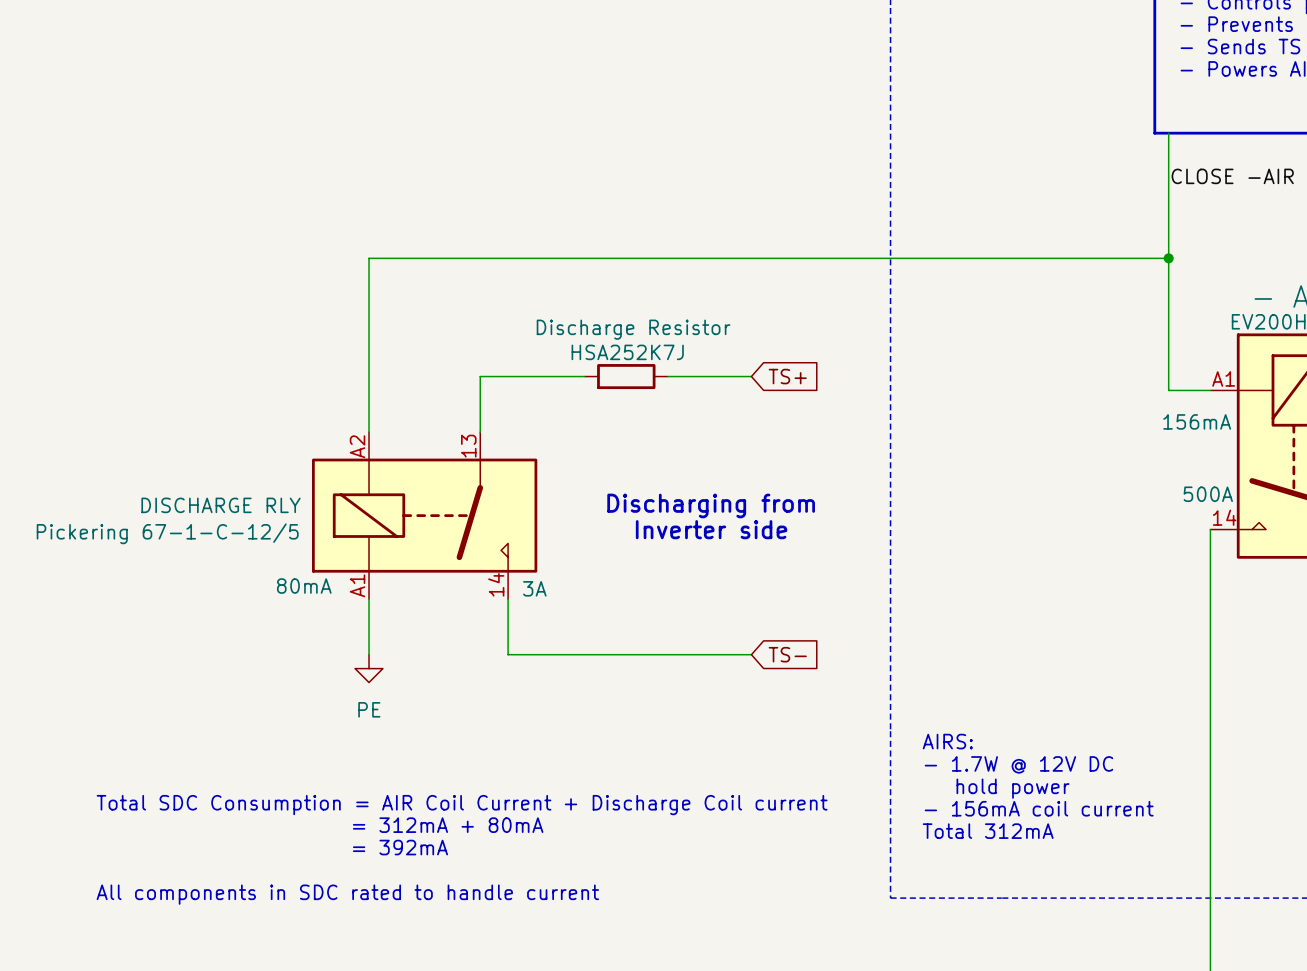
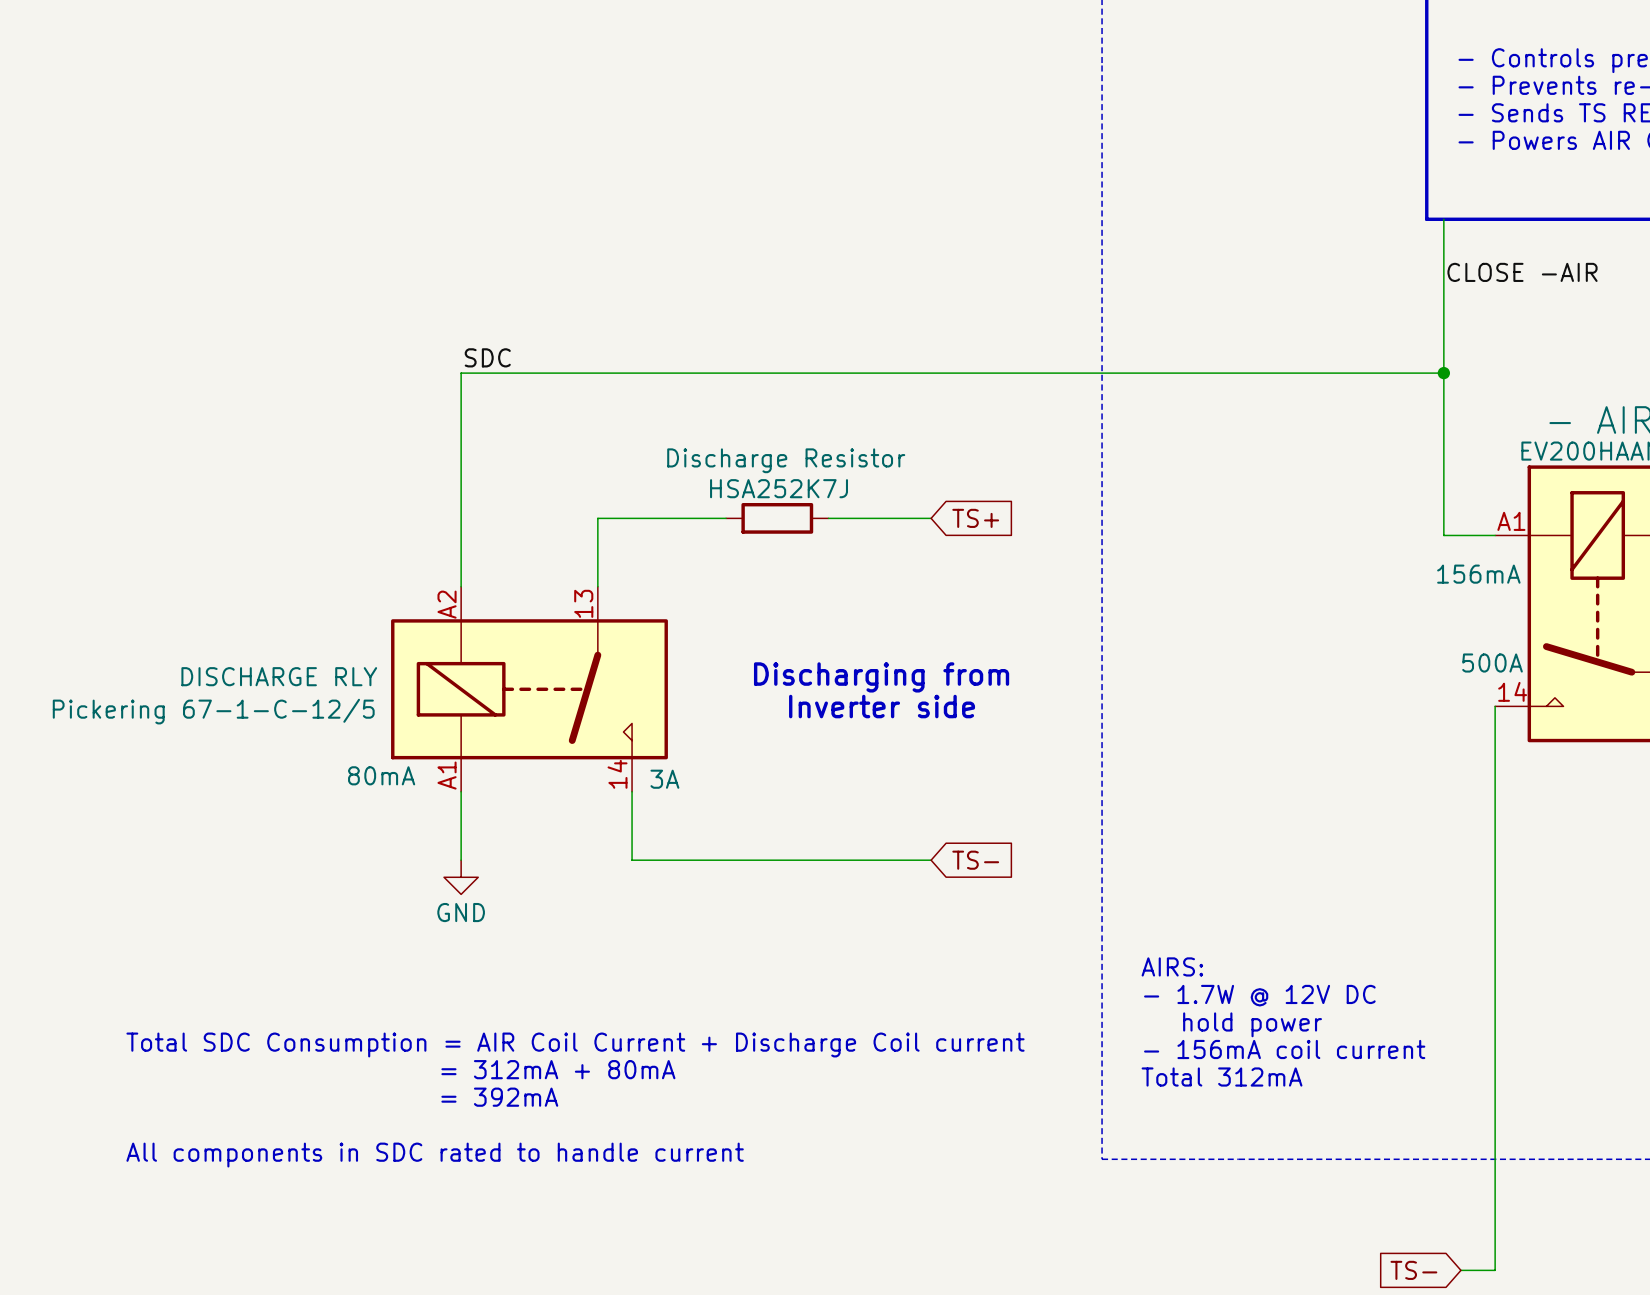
label: none -> SDC (487, 357)
power symbol: PE (369, 668) -> GND (461, 877)

